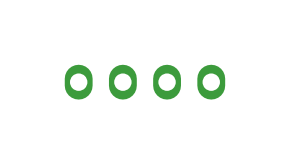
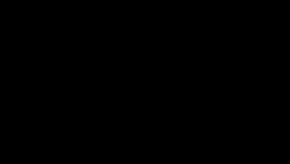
part: (144, 82) -> none

